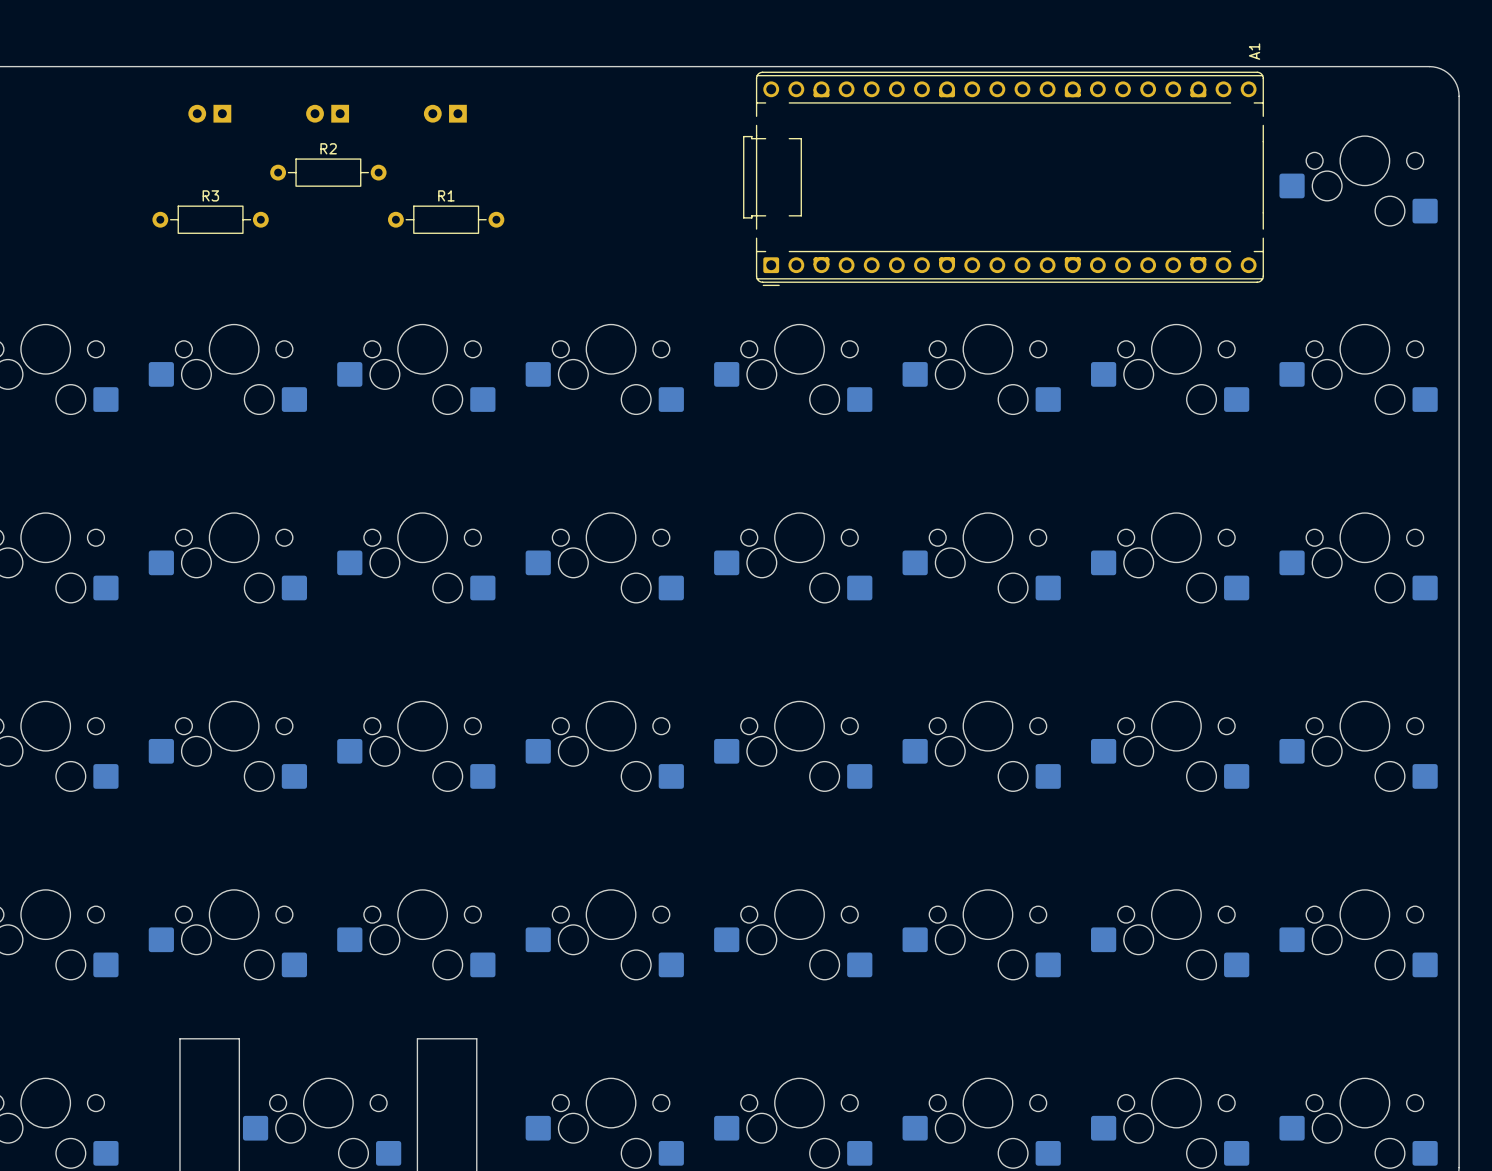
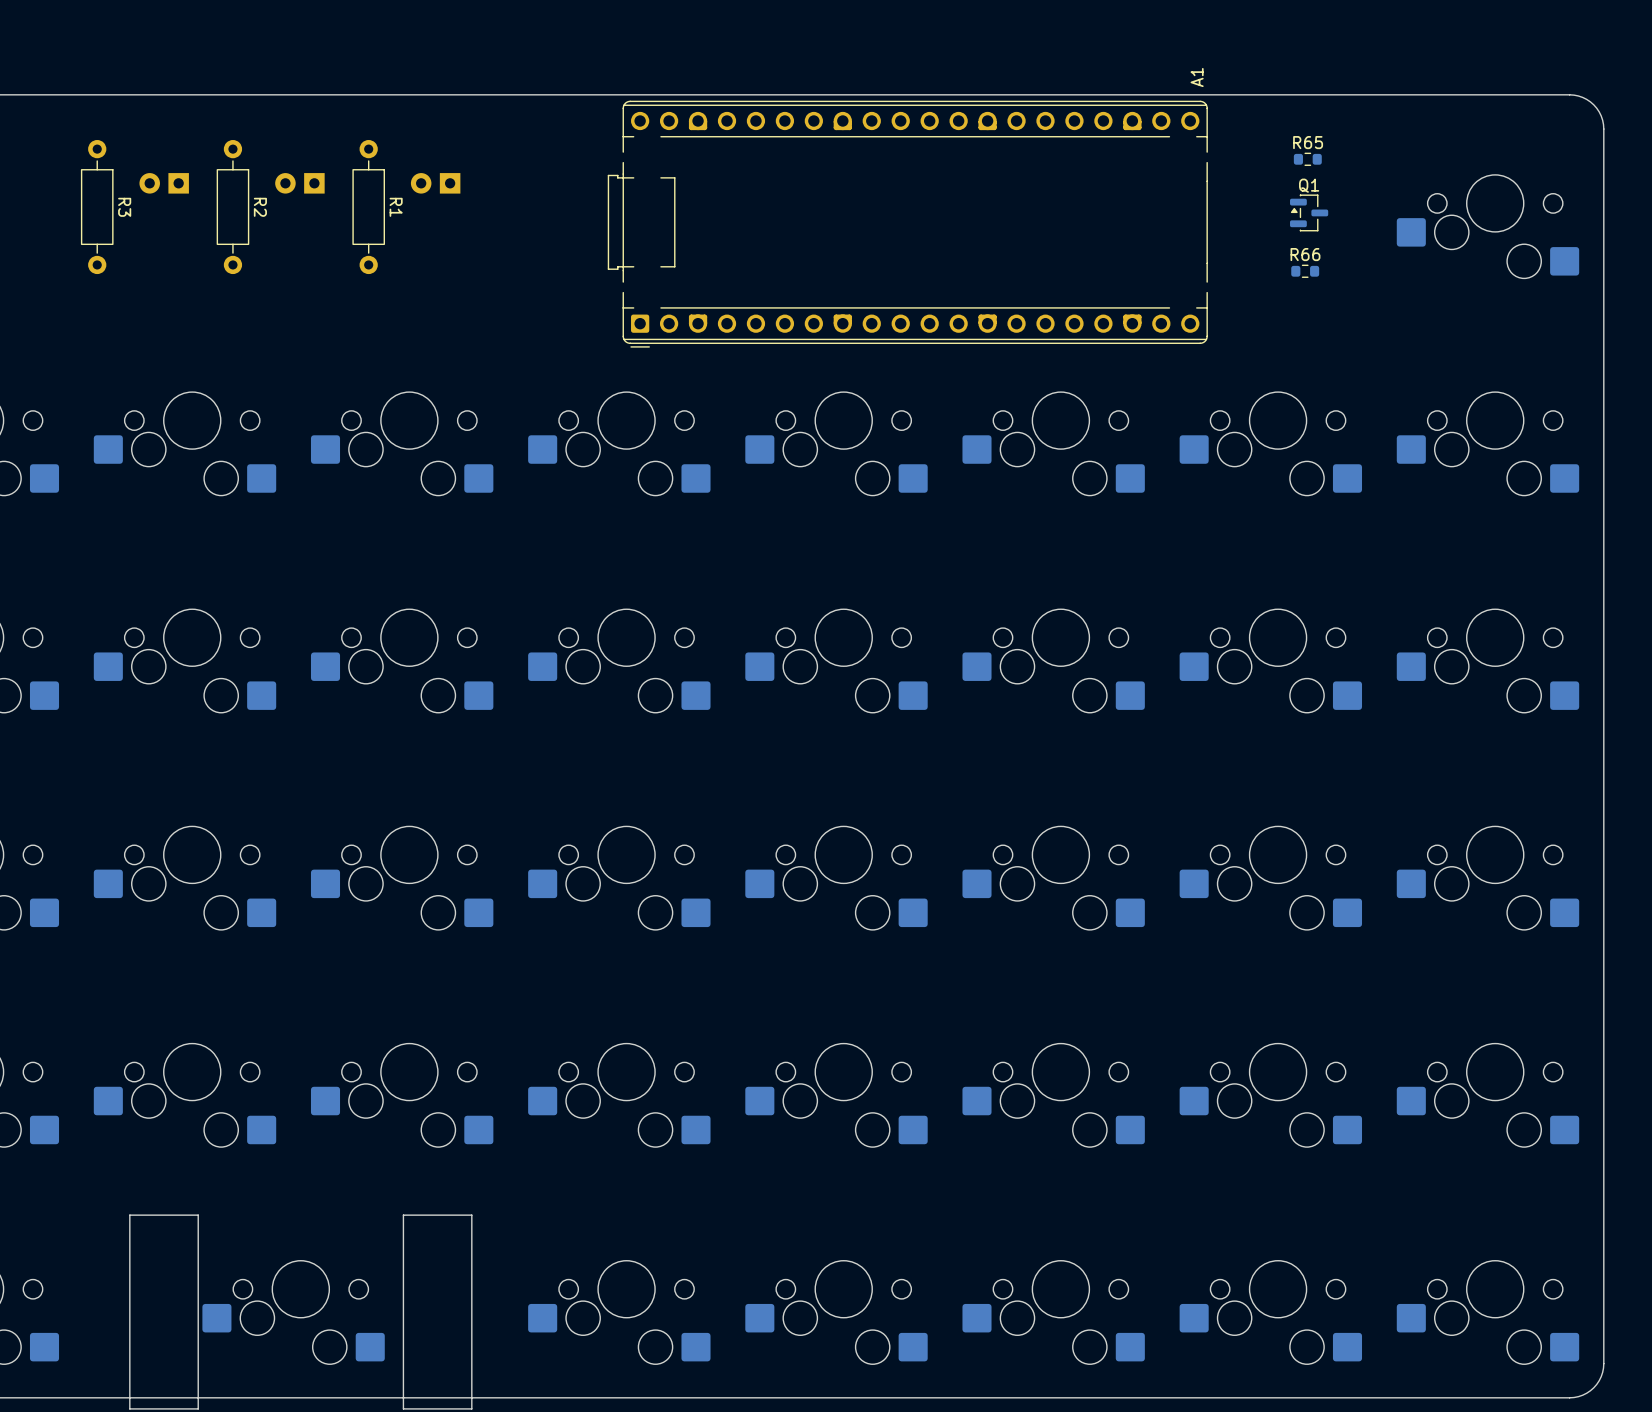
part position: (209, 113) -> (164, 183)
part position: (327, 113) -> (299, 183)
part position: (445, 113) -> (435, 183)
R65: none -> (1307, 159)
Q1: none -> (1309, 212)
R2 rotation: 0° (328, 172) -> 90° clockwise (232, 207)
A1 position: (1003, 178) -> (907, 224)
R3 rotation: 0° (210, 219) -> 90° clockwise (97, 207)
R3 position: (210, 219) -> (97, 207)
R1 rotation: 0° (446, 219) -> 90° clockwise (368, 207)
R1 position: (446, 219) -> (368, 207)
R66: none -> (1305, 271)

